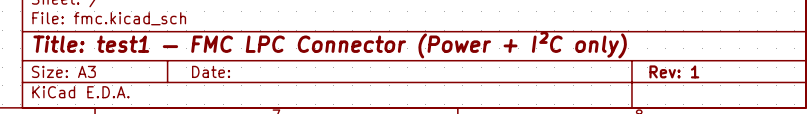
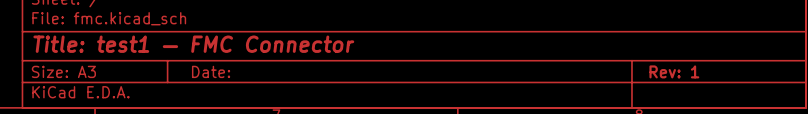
title block: Title: test1 — FMC LPC Connector (Power + I²C only) (330, 44) -> Title: test1 — FMC Connector (193, 44)

